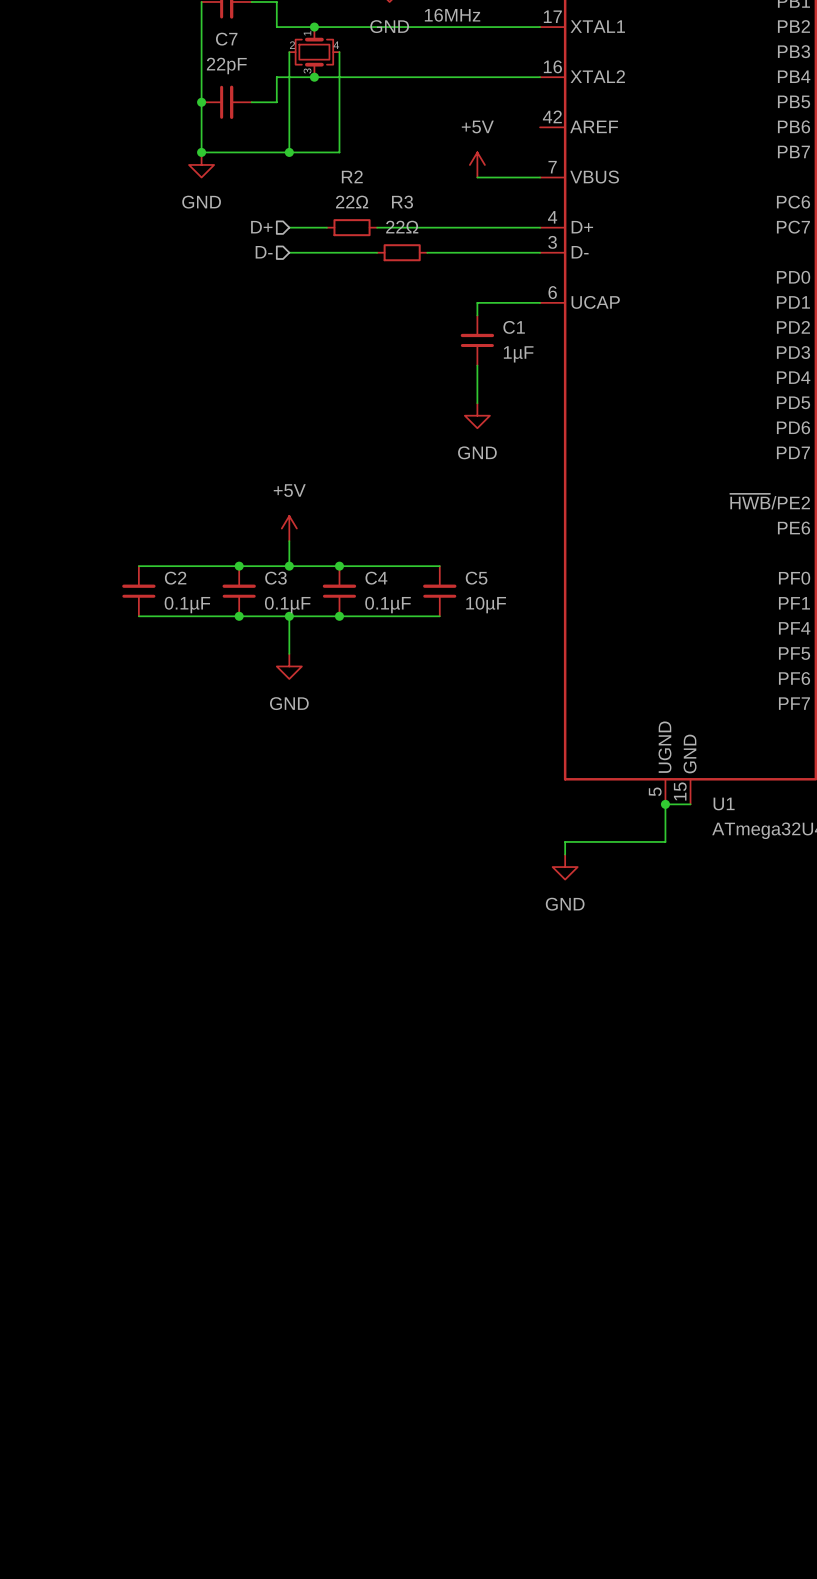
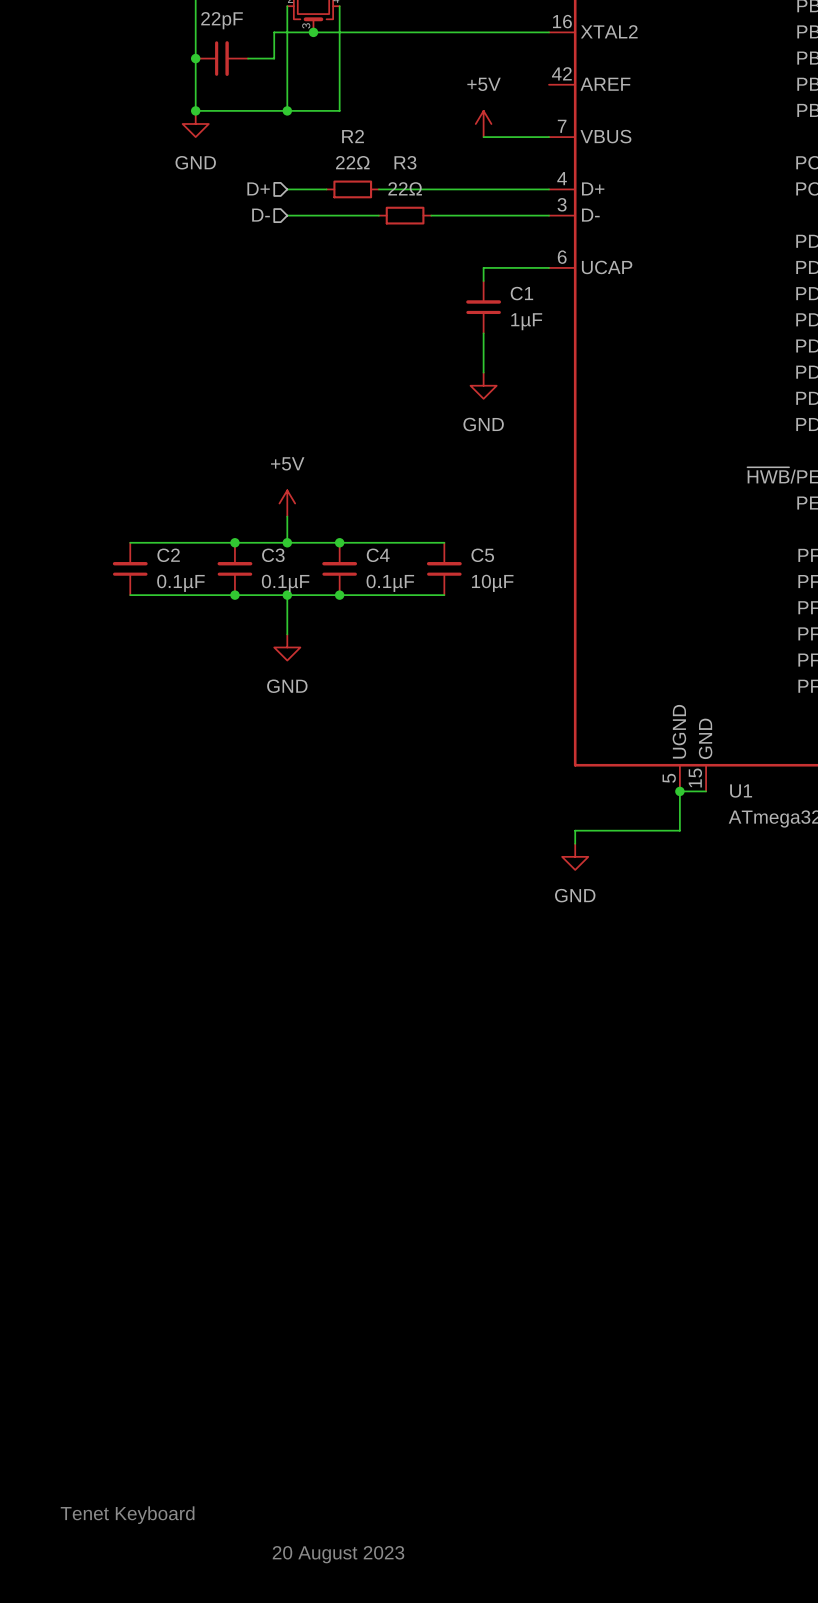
text: none -> Tenet Keyboard (127, 1515)
text: none -> 20 August 2023 (338, 1554)

